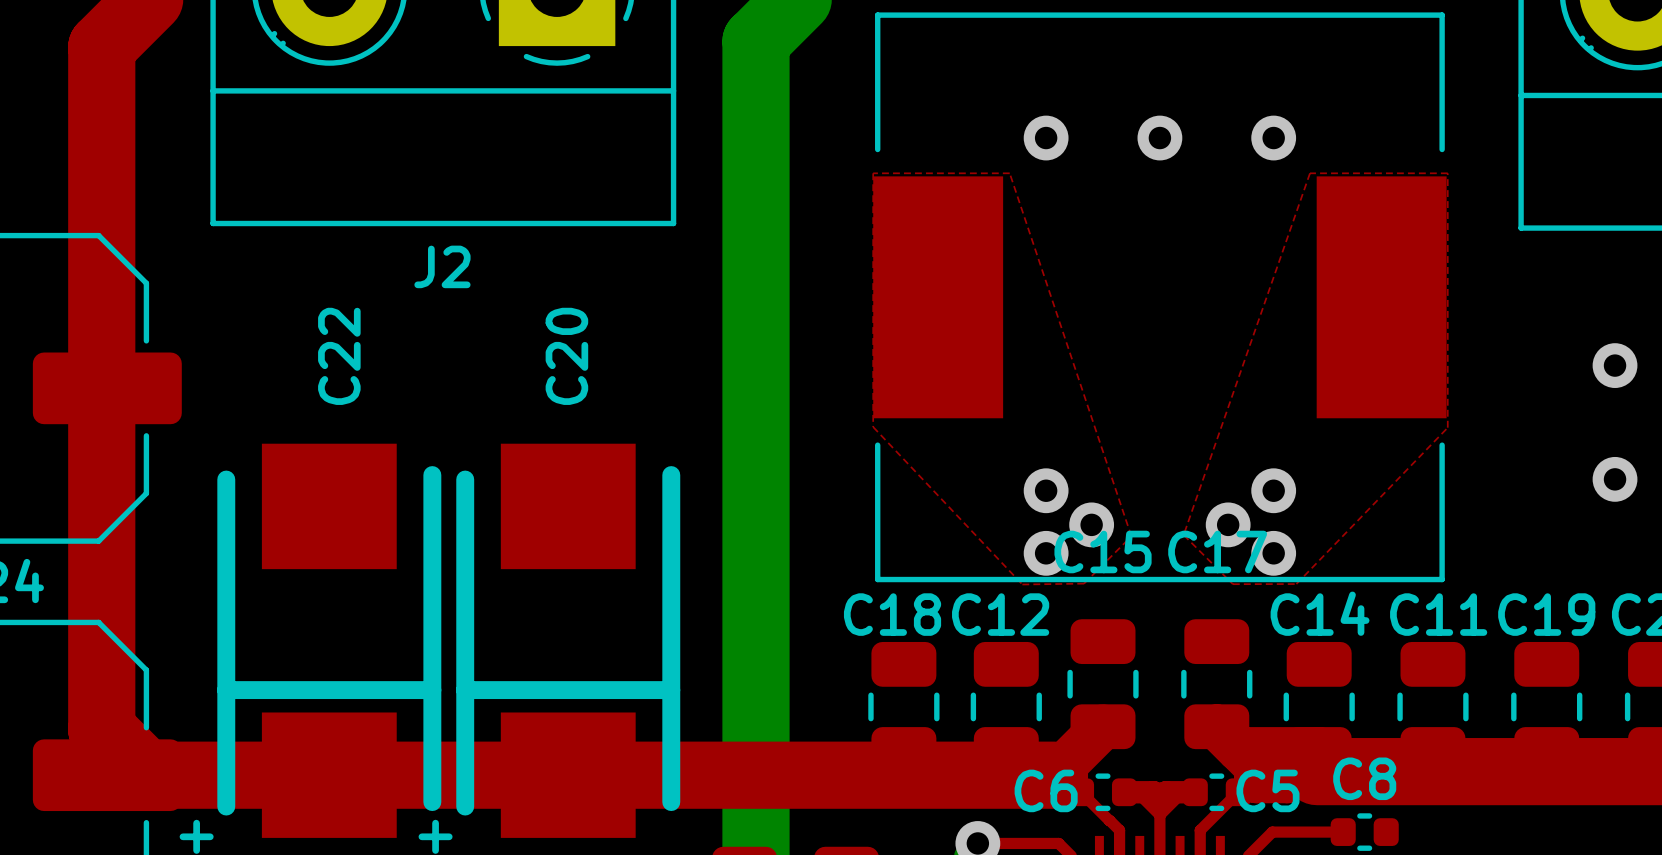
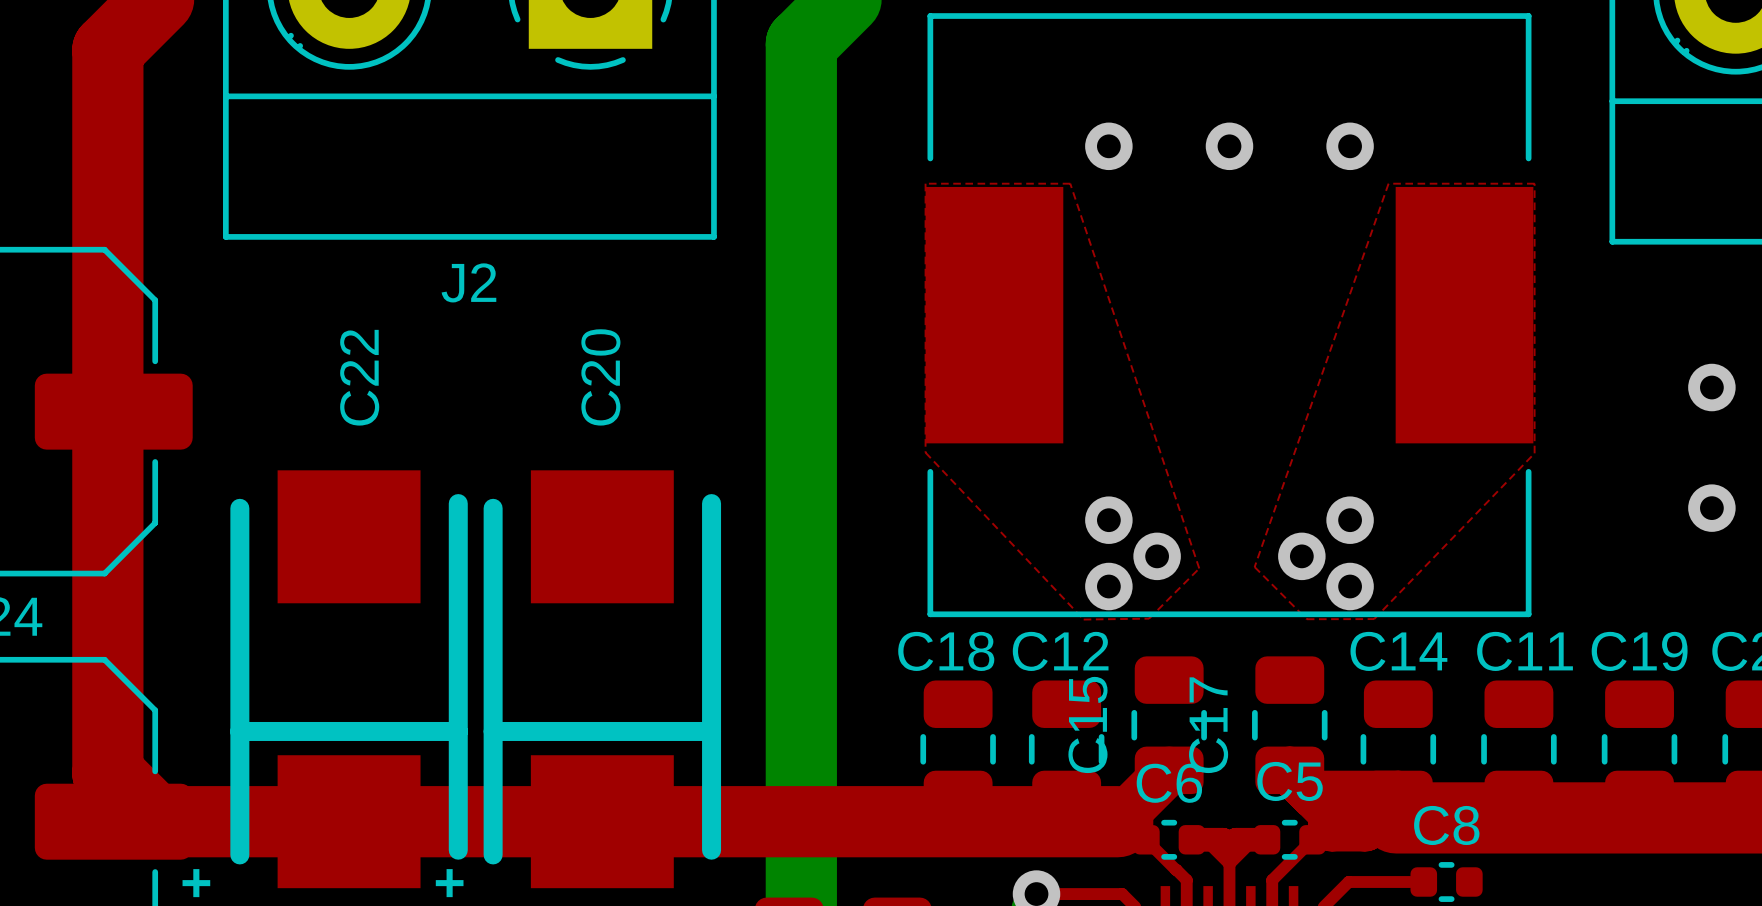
C15 name rotation: 0° (1103, 551) -> 90° counterclockwise (1087, 724)
C15 name position: C15 (1103, 551) -> C15 (1087, 724)
C17 name rotation: 0° (1217, 551) -> 90° counterclockwise (1208, 725)
C17 name position: C17 (1217, 551) -> C17 (1208, 725)
C6 name position: C6 (1046, 790) -> C6 (1169, 783)
C5 name position: C5 (1267, 790) -> C5 (1290, 781)

